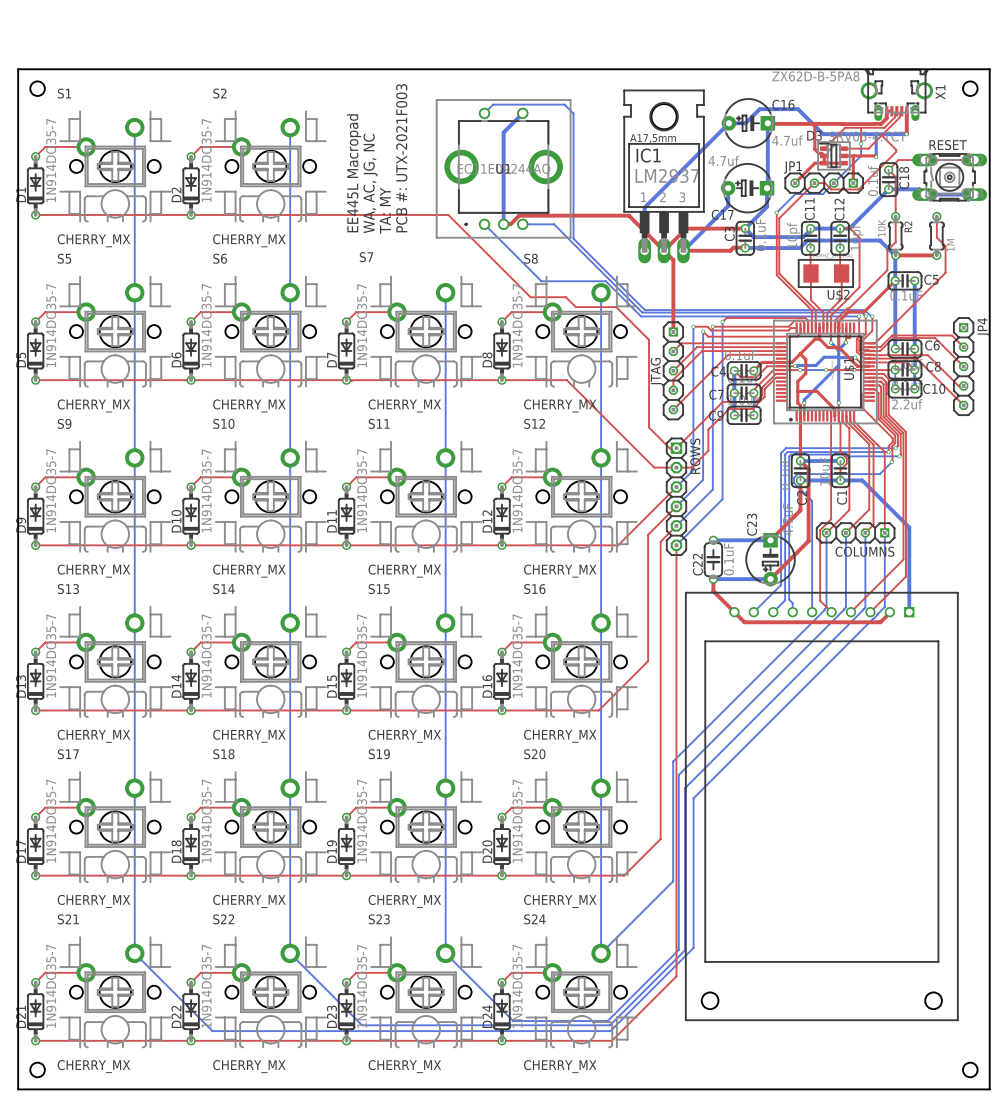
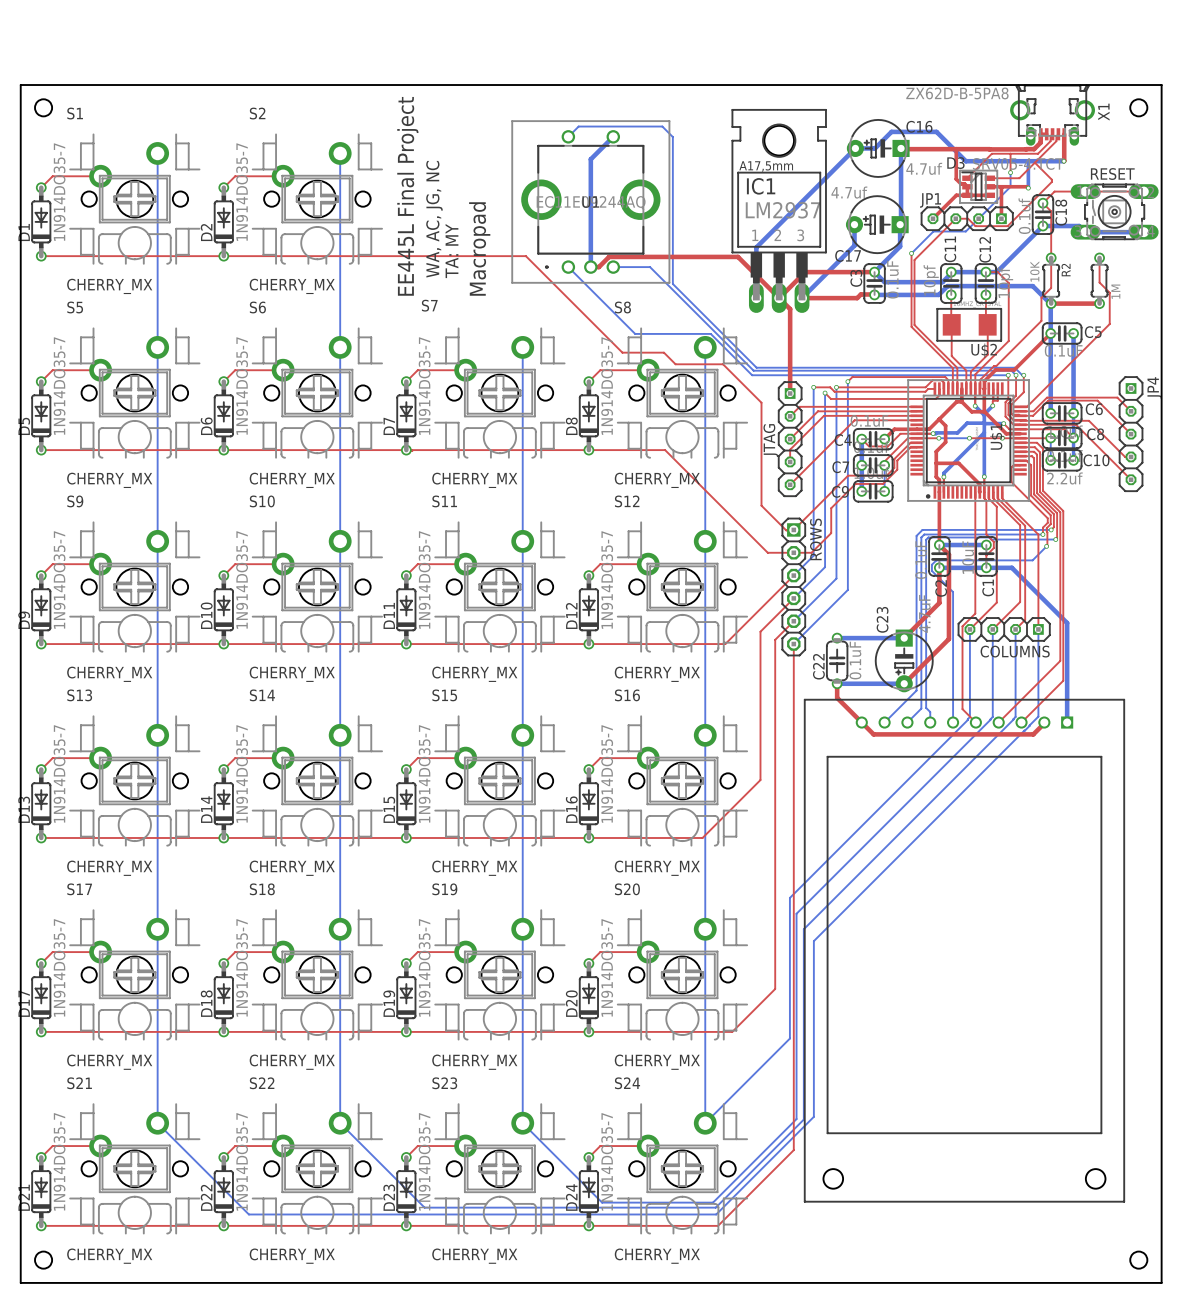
text: PCB #: UTX-2021F003 (401, 158) -> none
text: none -> EE445L Final Project (407, 196)
text: EE445L Macropad (354, 173) -> none
text: none -> Macropad (479, 248)

